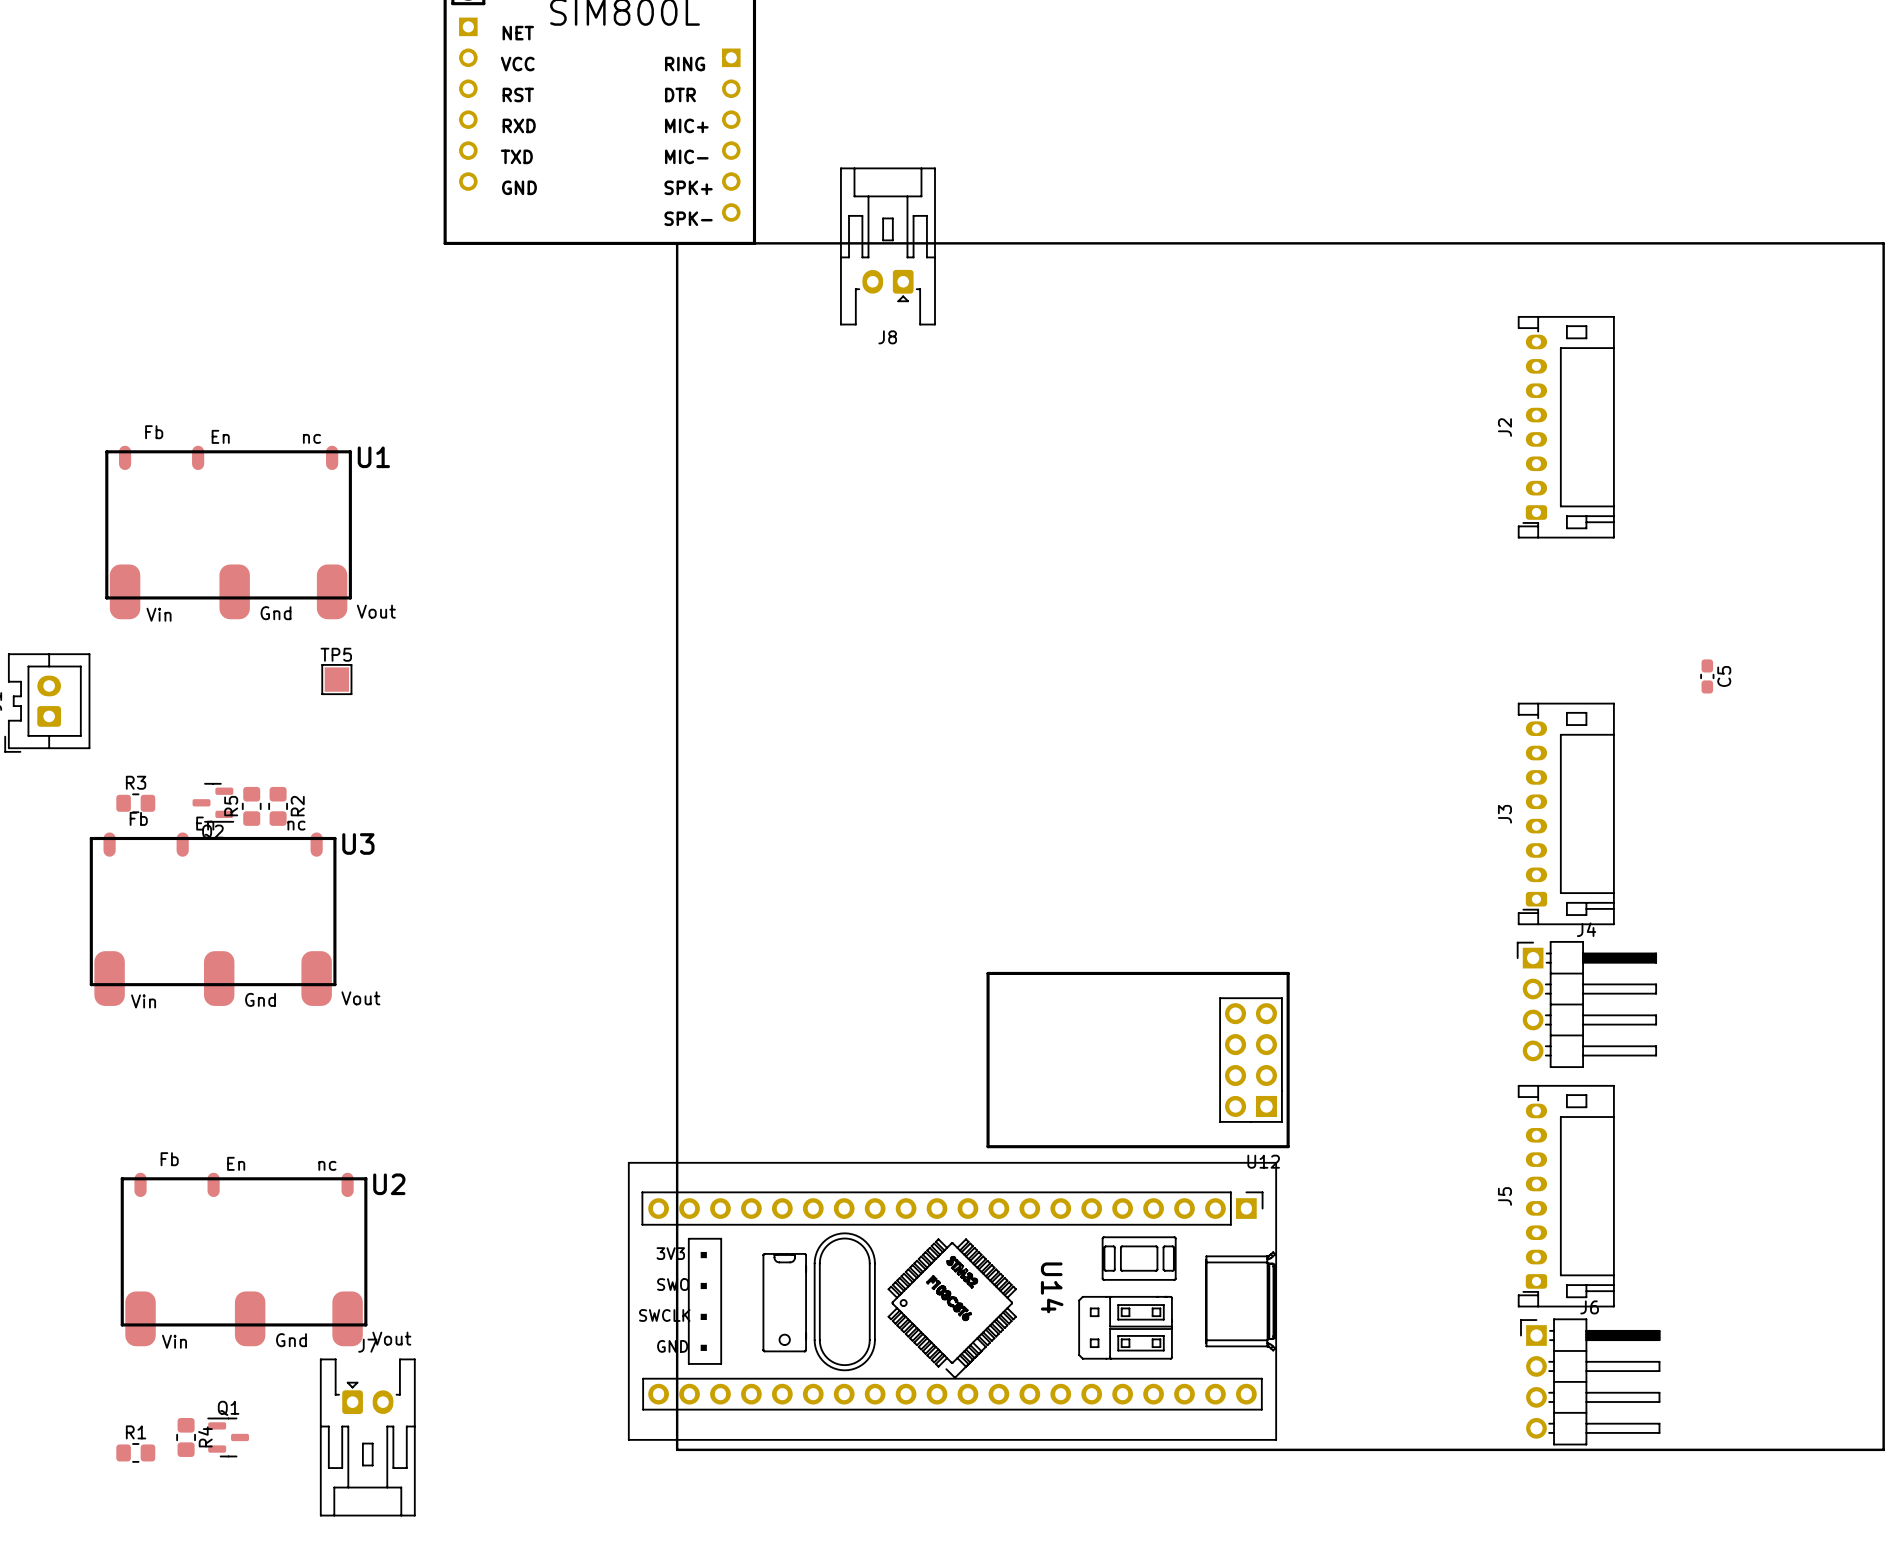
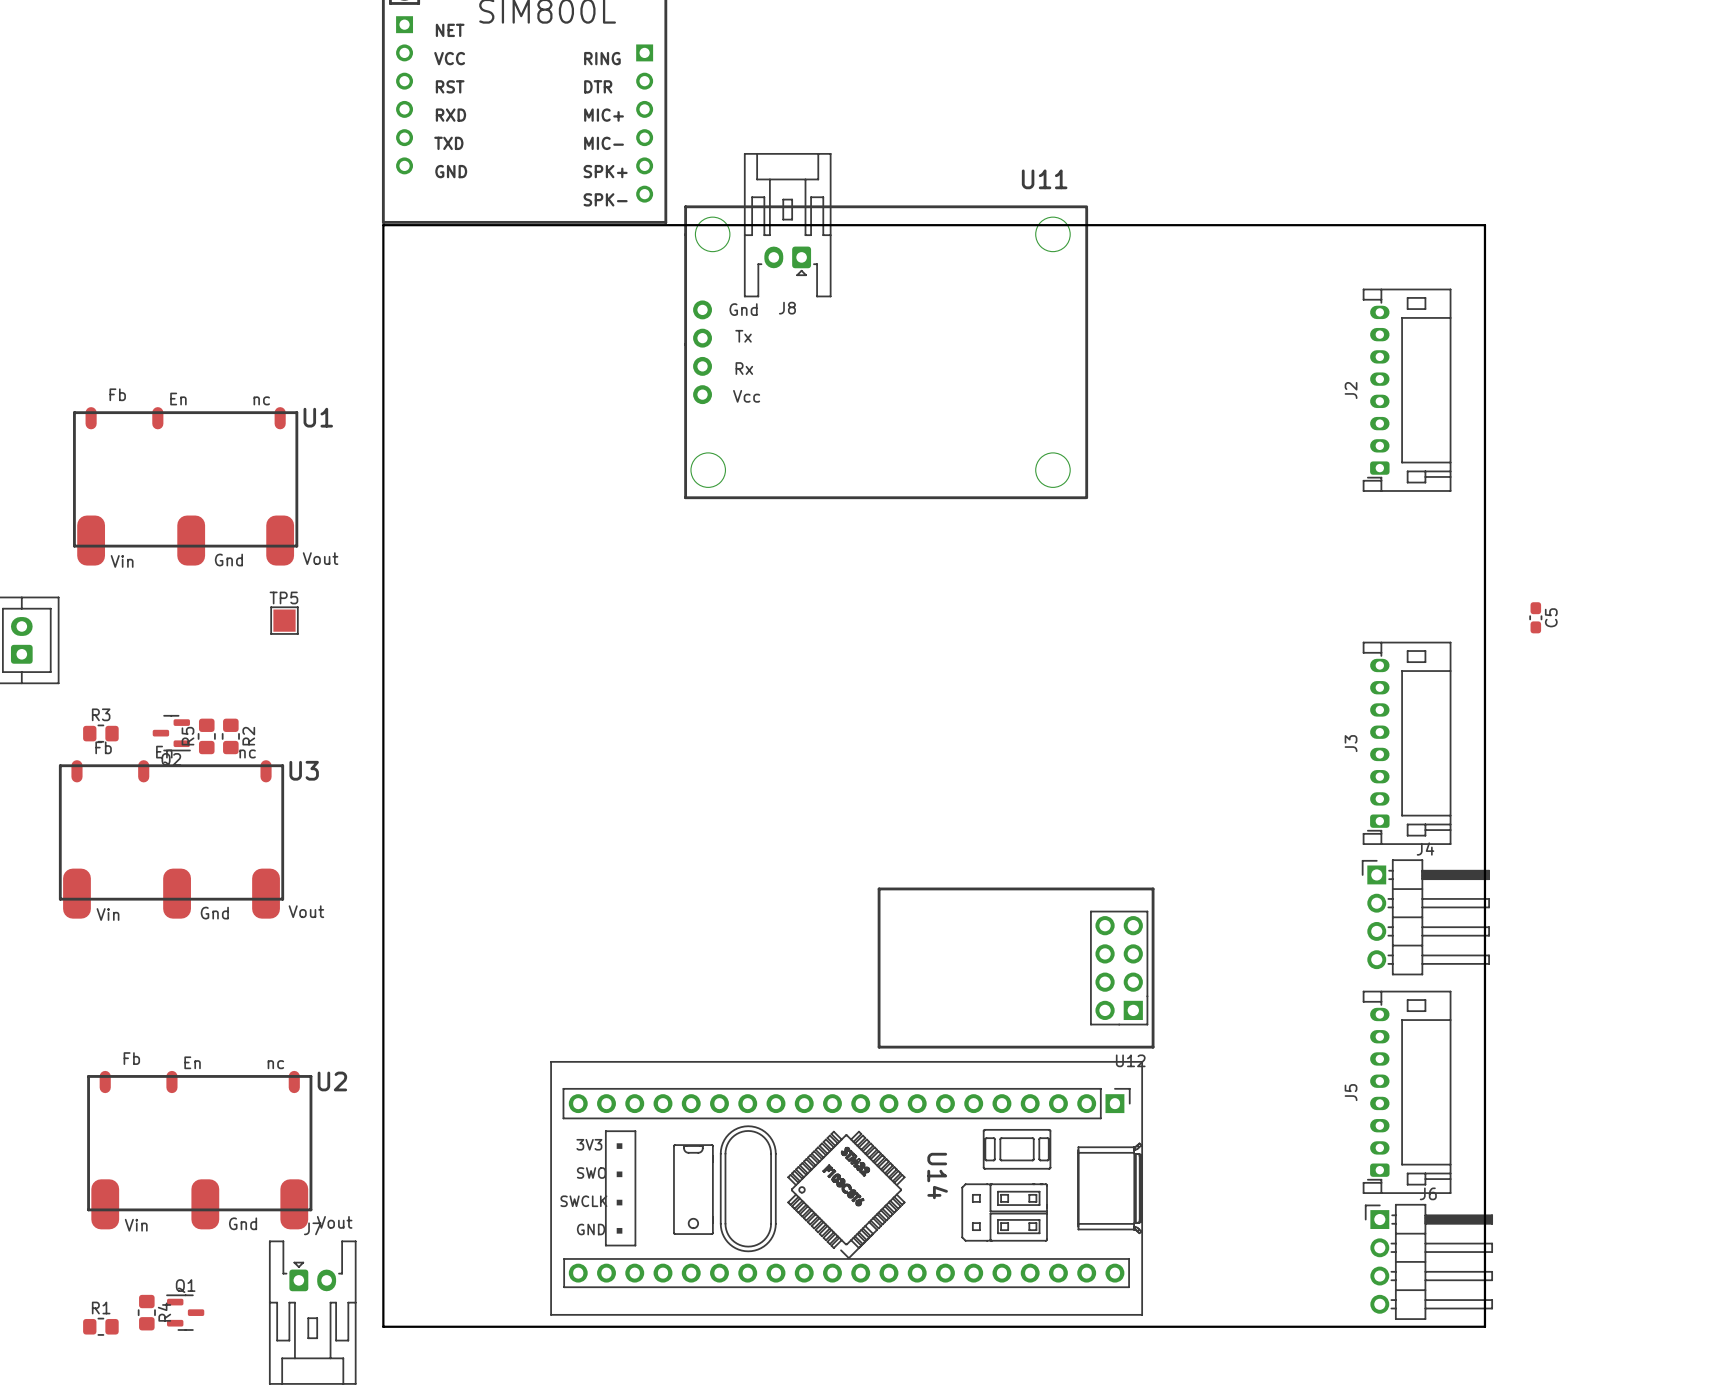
board edge: (677, 243) (1883, 243) (1883, 1449) (677, 1449) (677, 243) -> (383, 225) (383, 1326) (1484, 1326) (1484, 225) (383, 225)
U11: none -> (886, 352)

